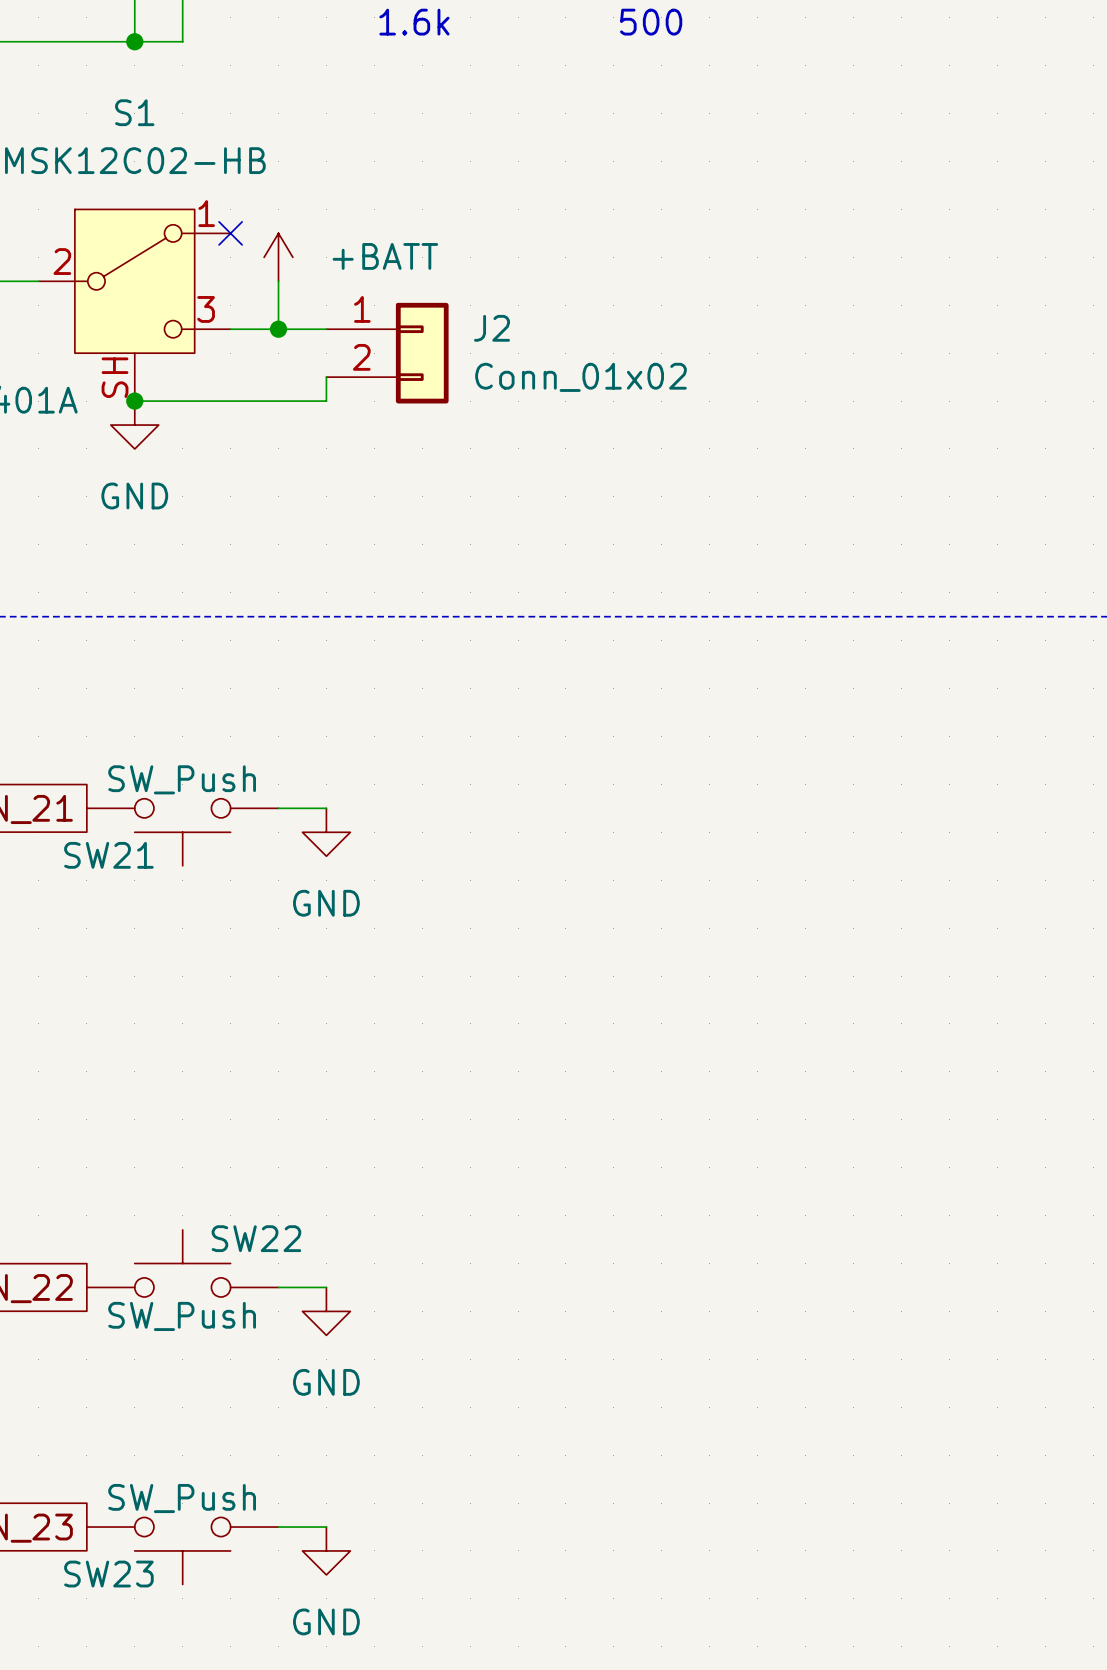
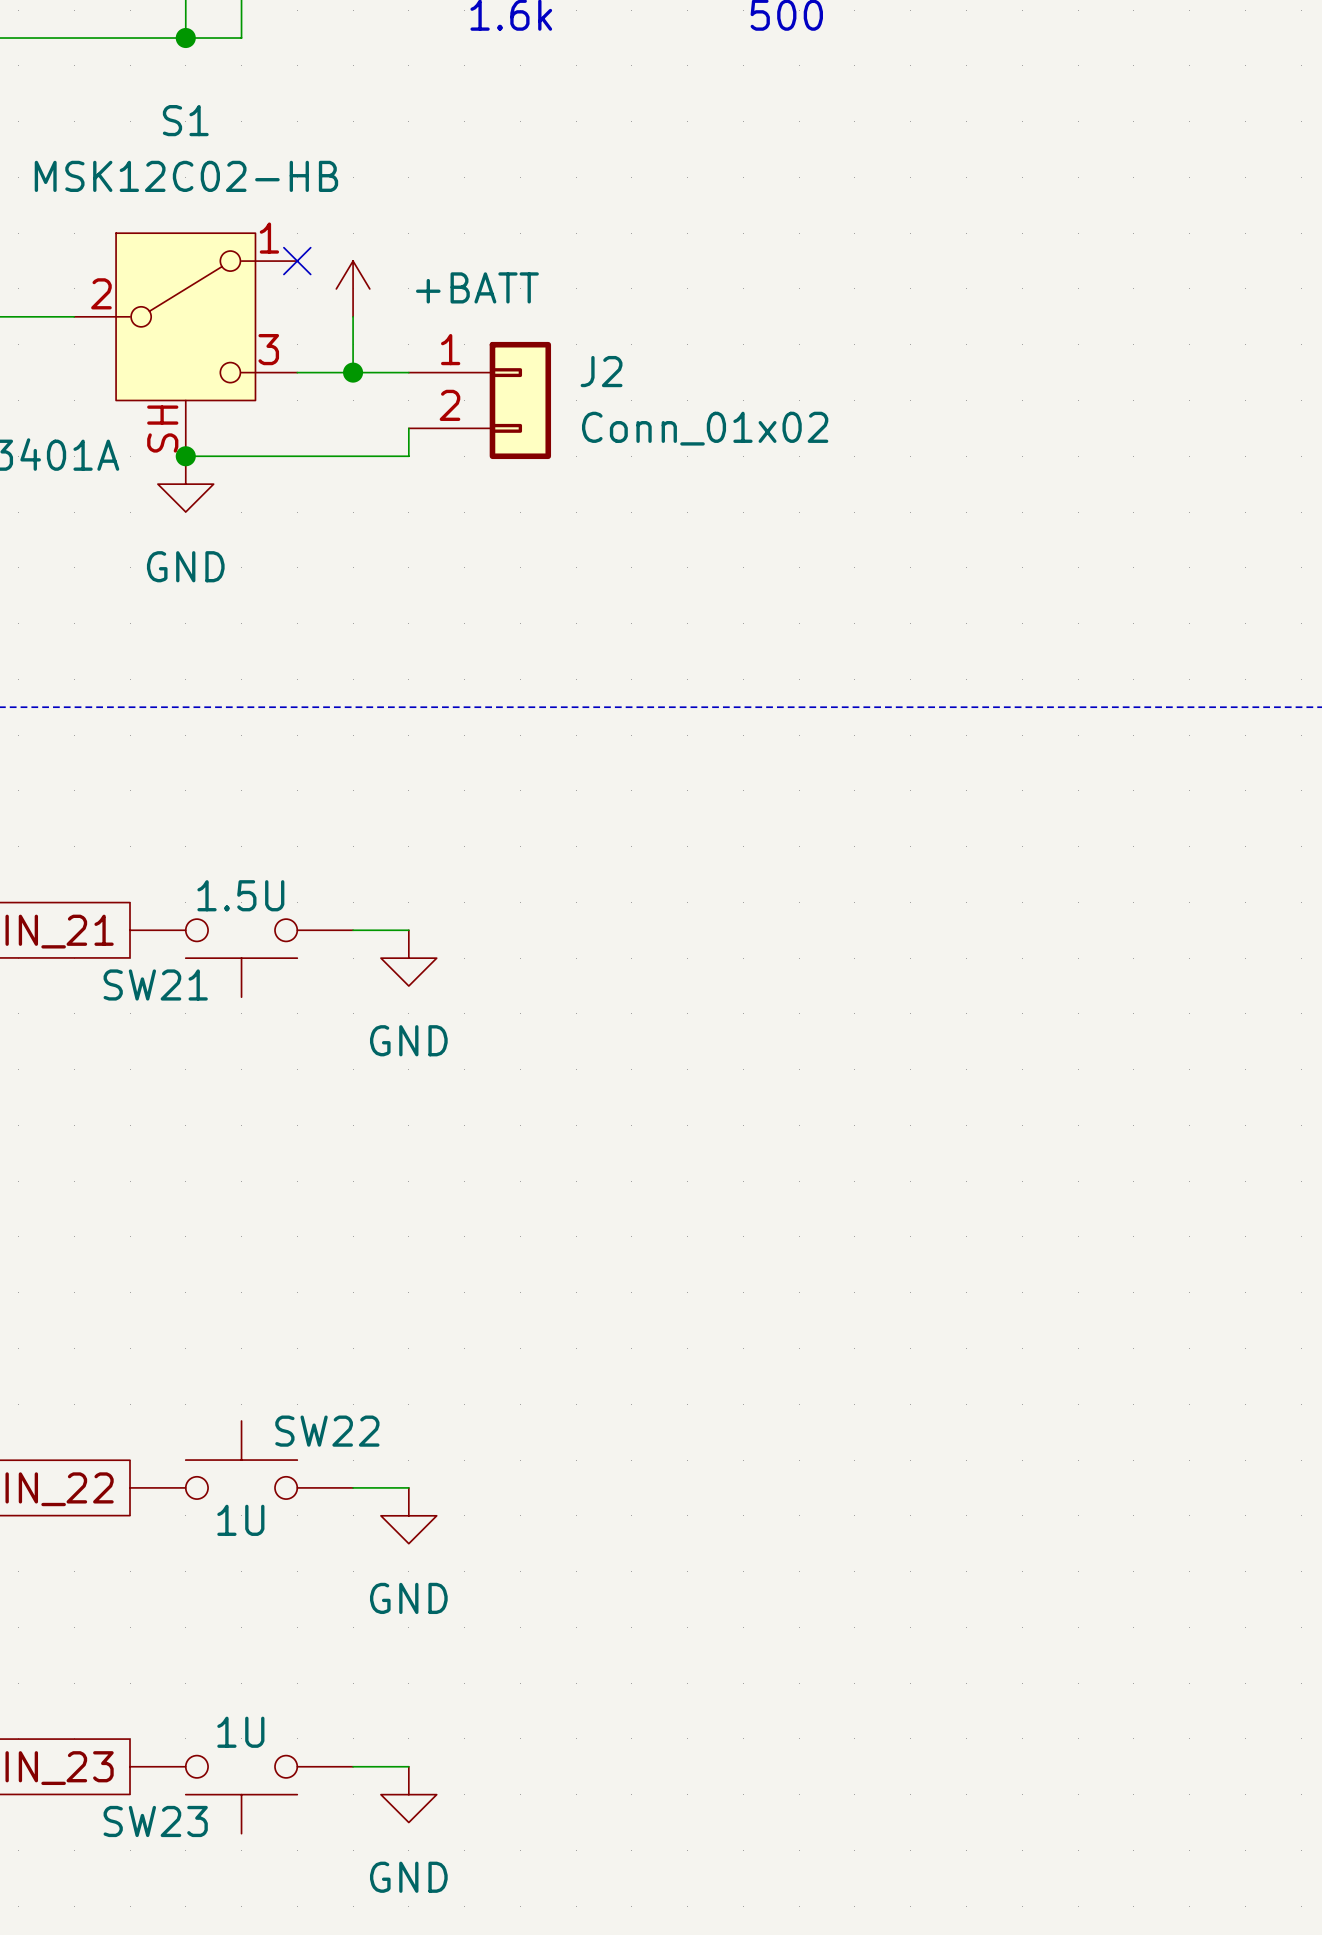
SW21 value: SW_Push (182, 779) -> 1.5U (240, 895)
SW22 value: SW_Push (182, 1316) -> 1U (240, 1520)
SW23 value: SW_Push (182, 1498) -> 1U (240, 1732)

